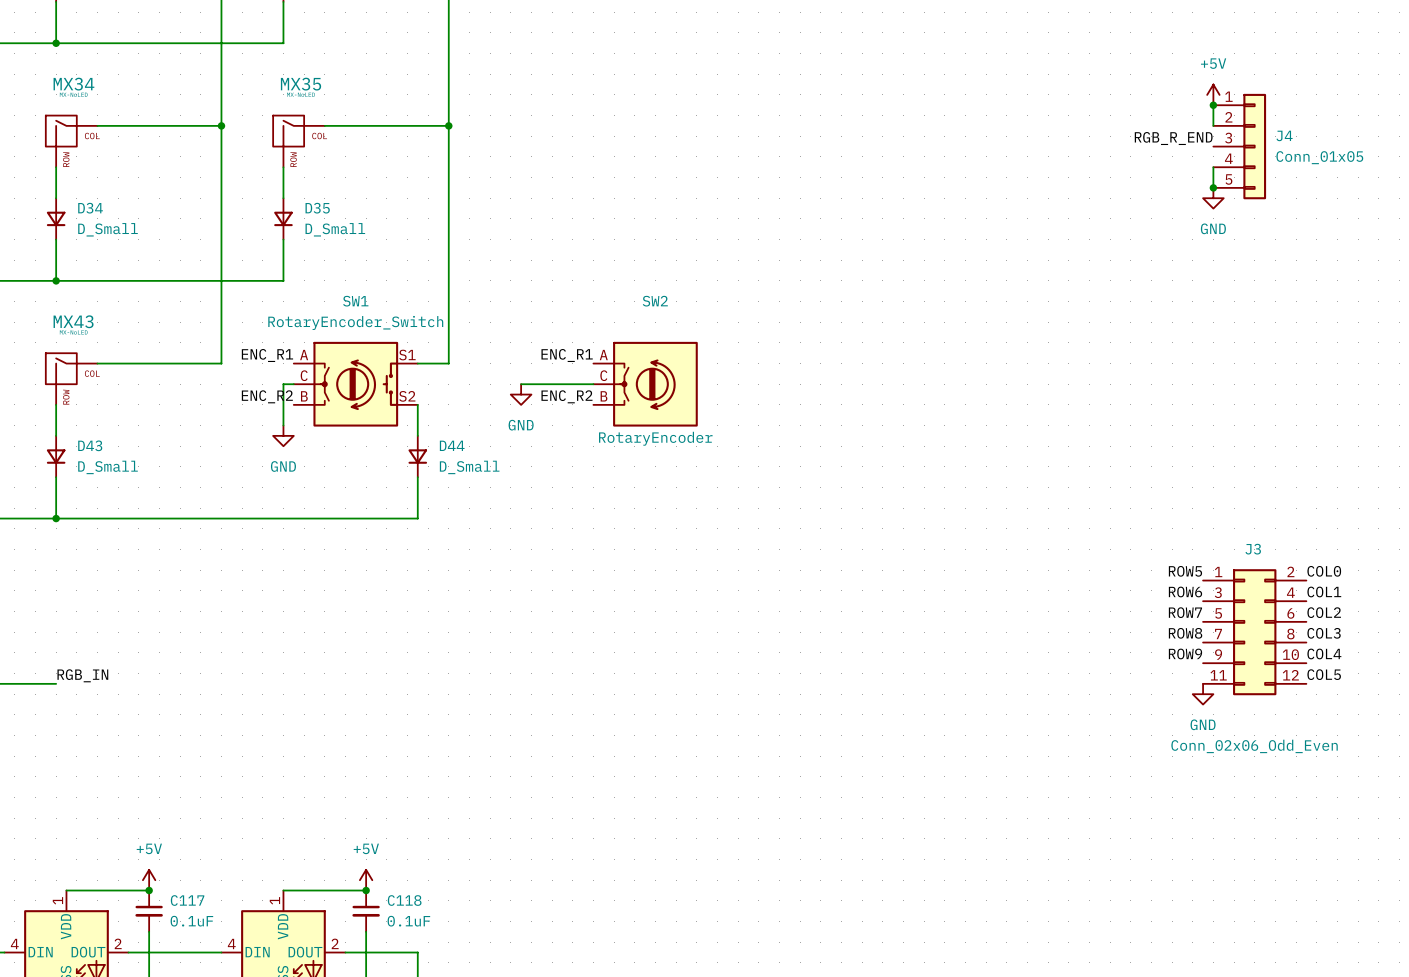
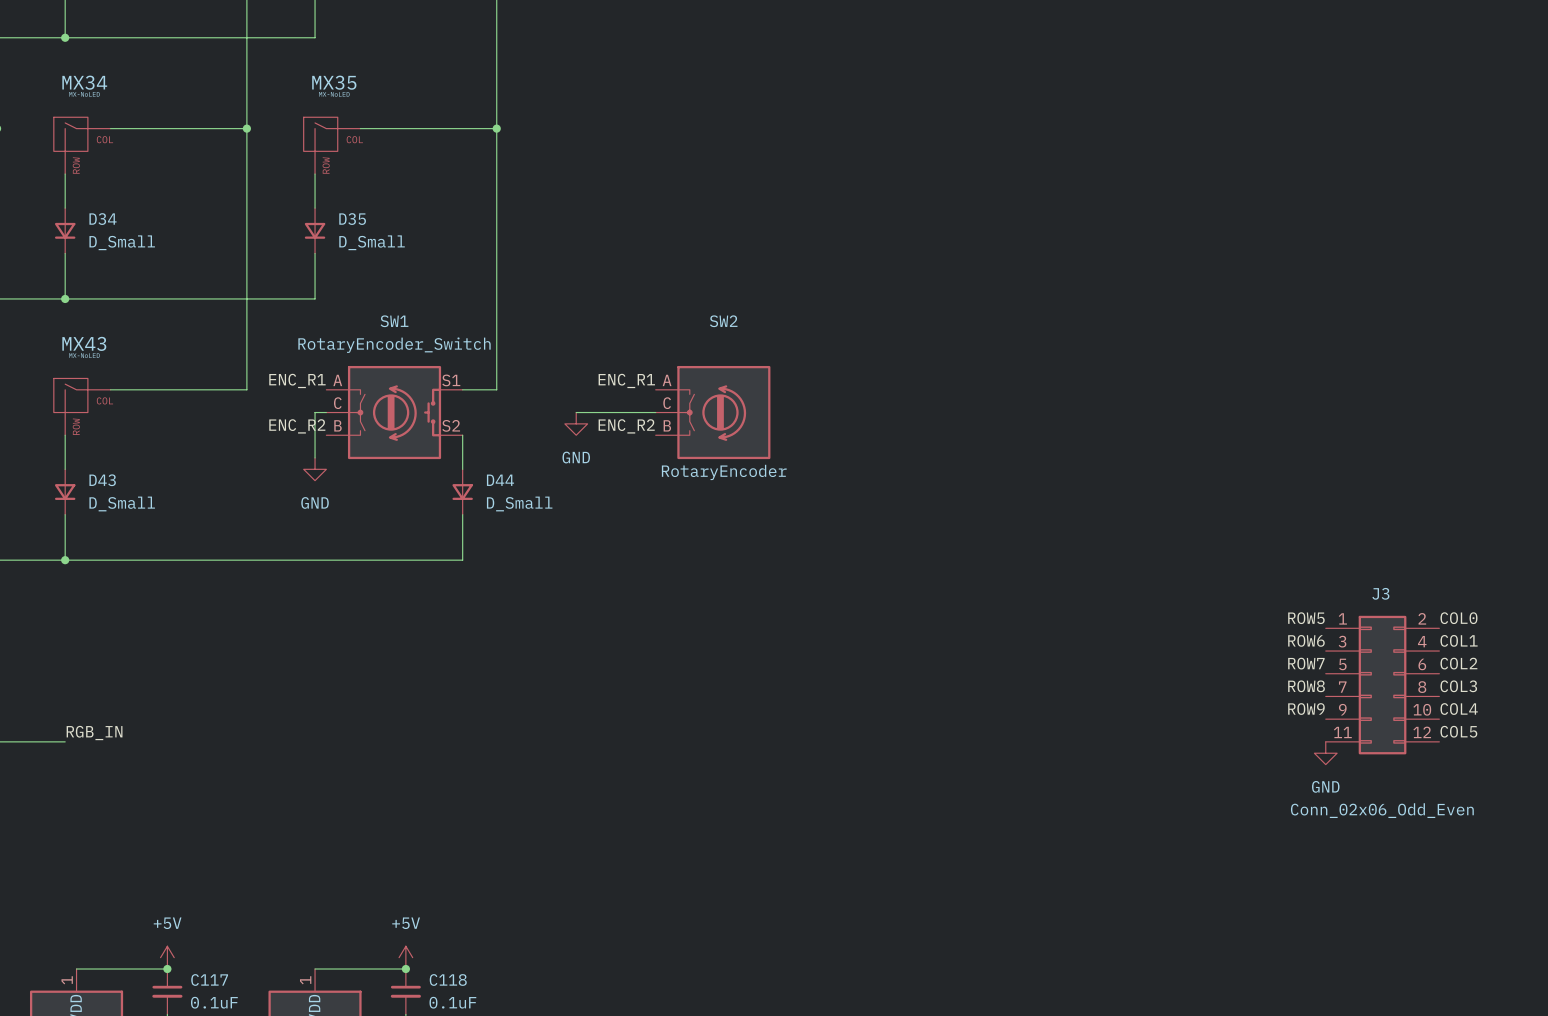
power symbol: +5V (1213, 94) -> none
wire: (1213, 105) (1213, 125) -> none
junction: (1213, 105) -> none
label: RGB_R_END (1173, 138) -> none
J4: Conn_01x05 (1239, 146) -> none
wire: (1213, 167) (1213, 187) -> none
junction: (1213, 187) -> none
power symbol: GND (1213, 198) -> none

